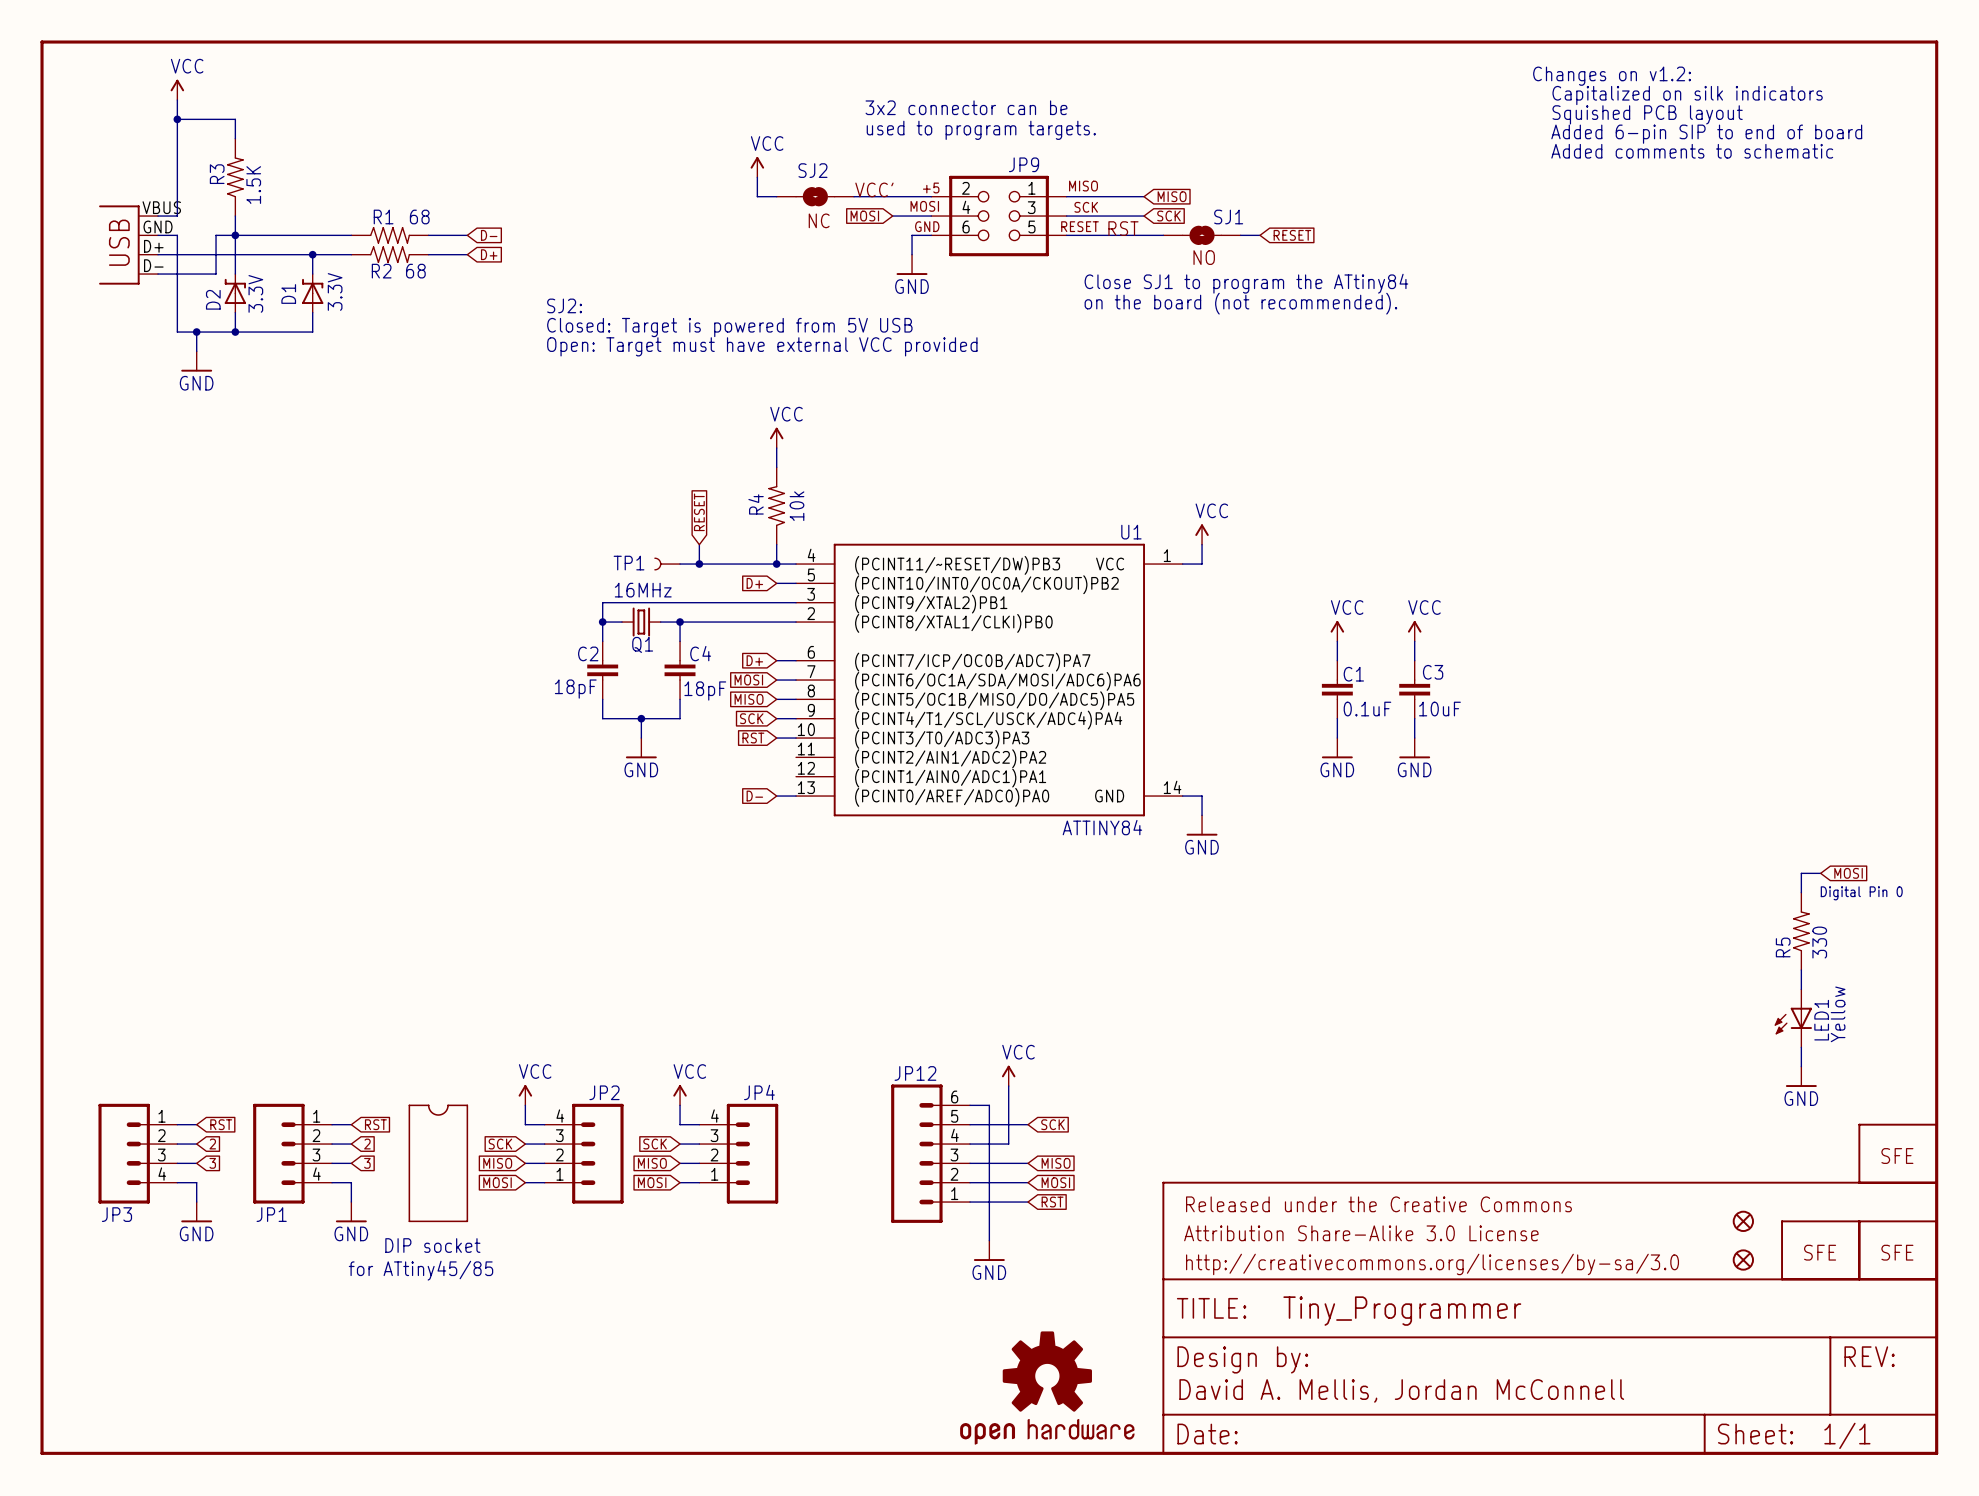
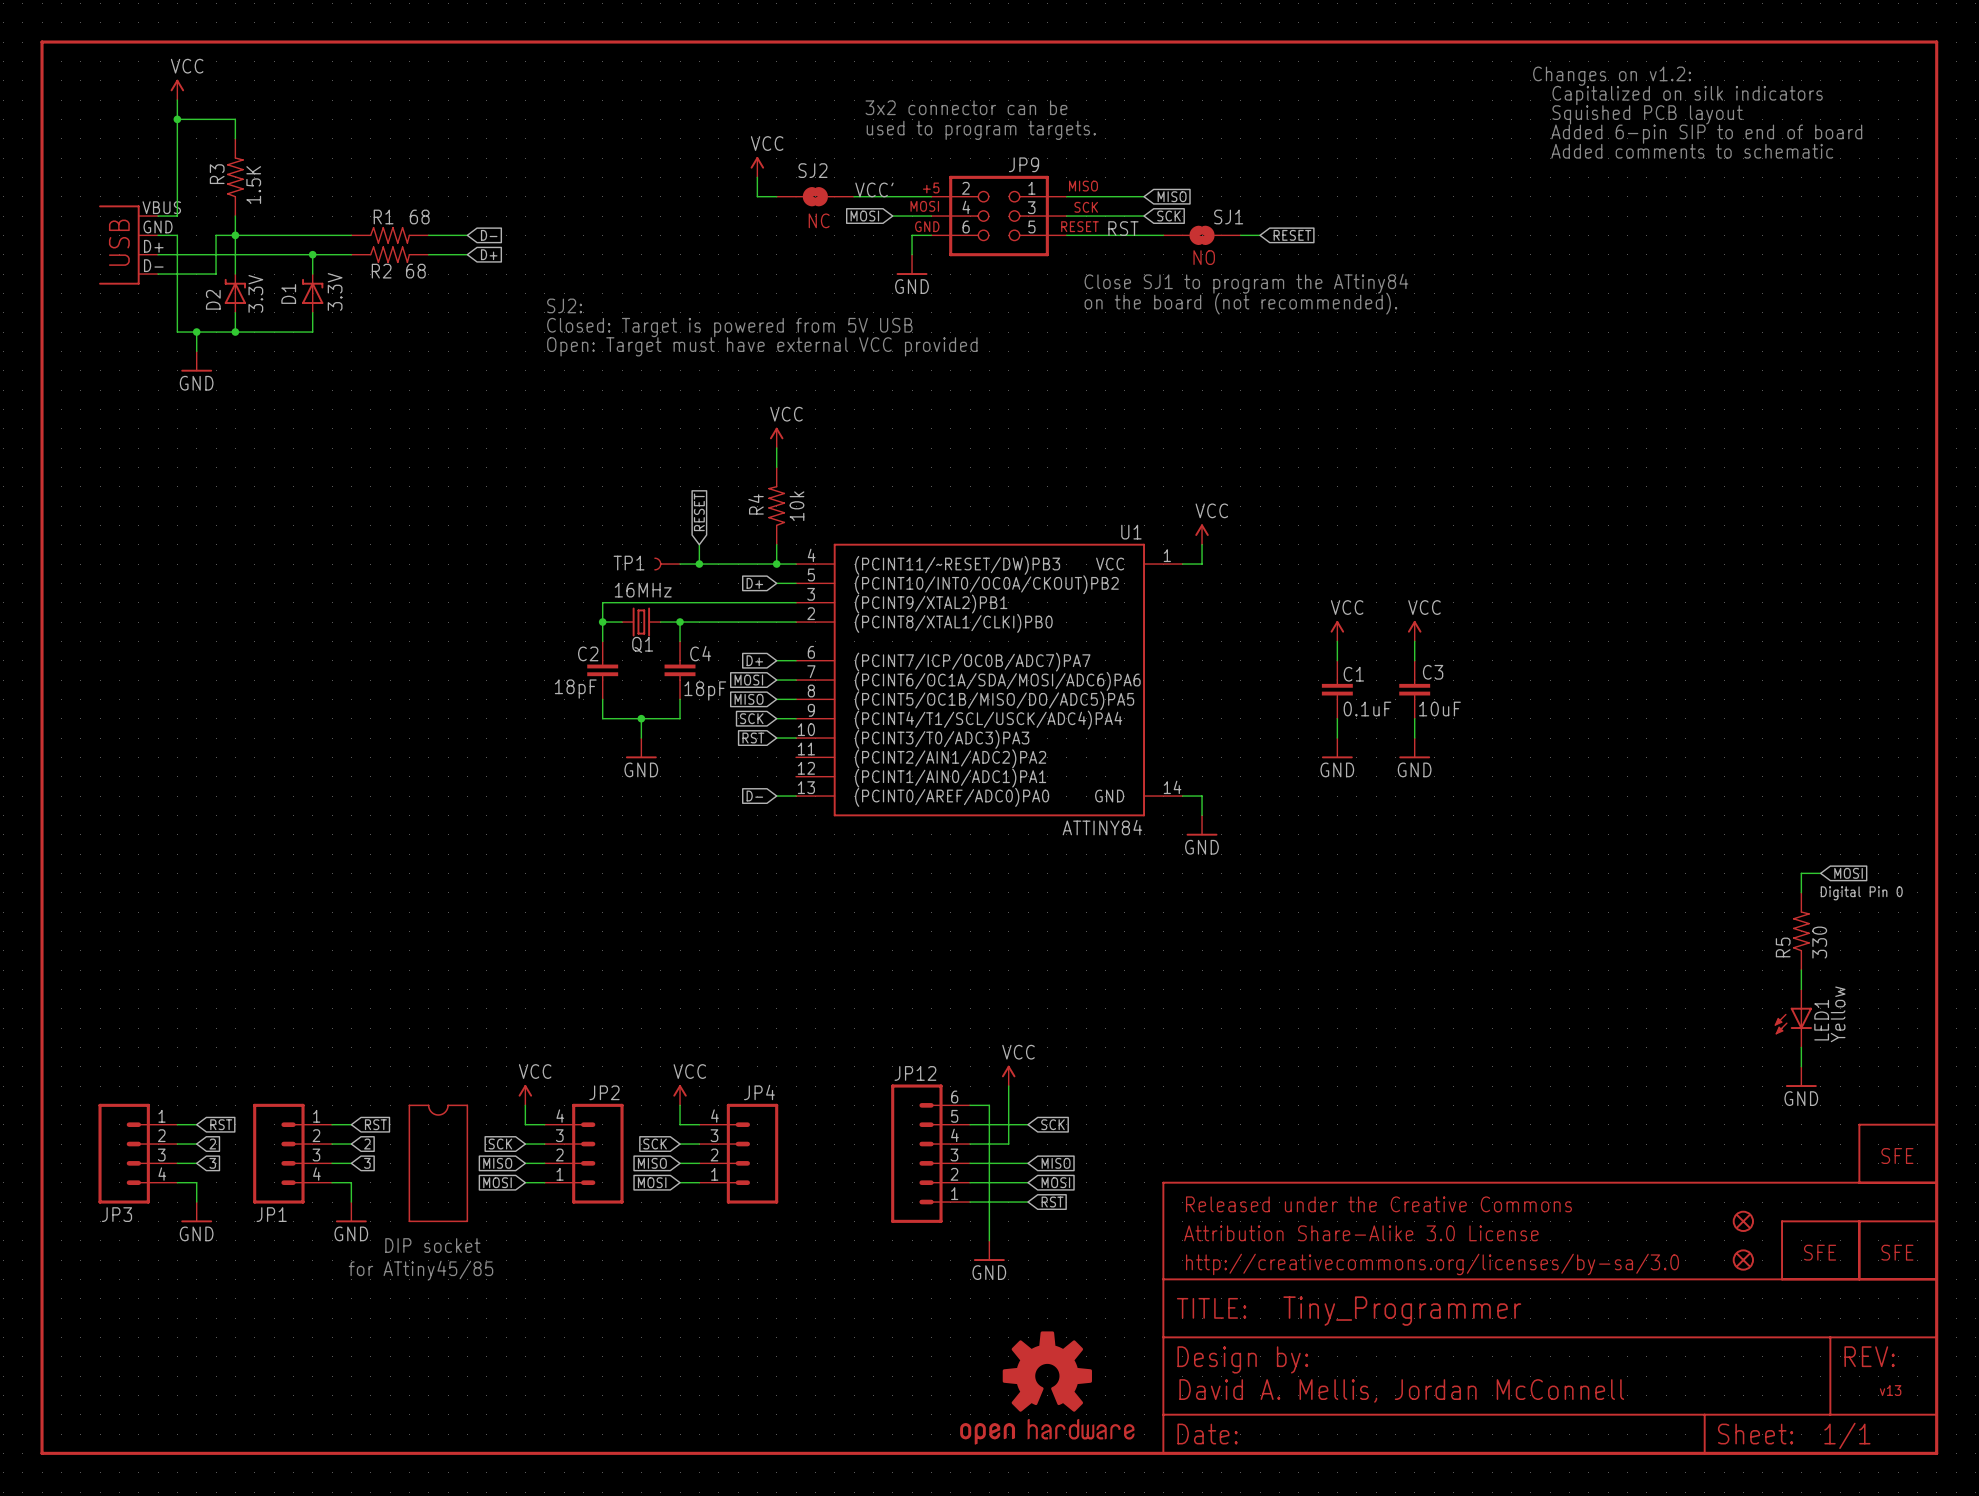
text: none -> v13 (1890, 1390)

